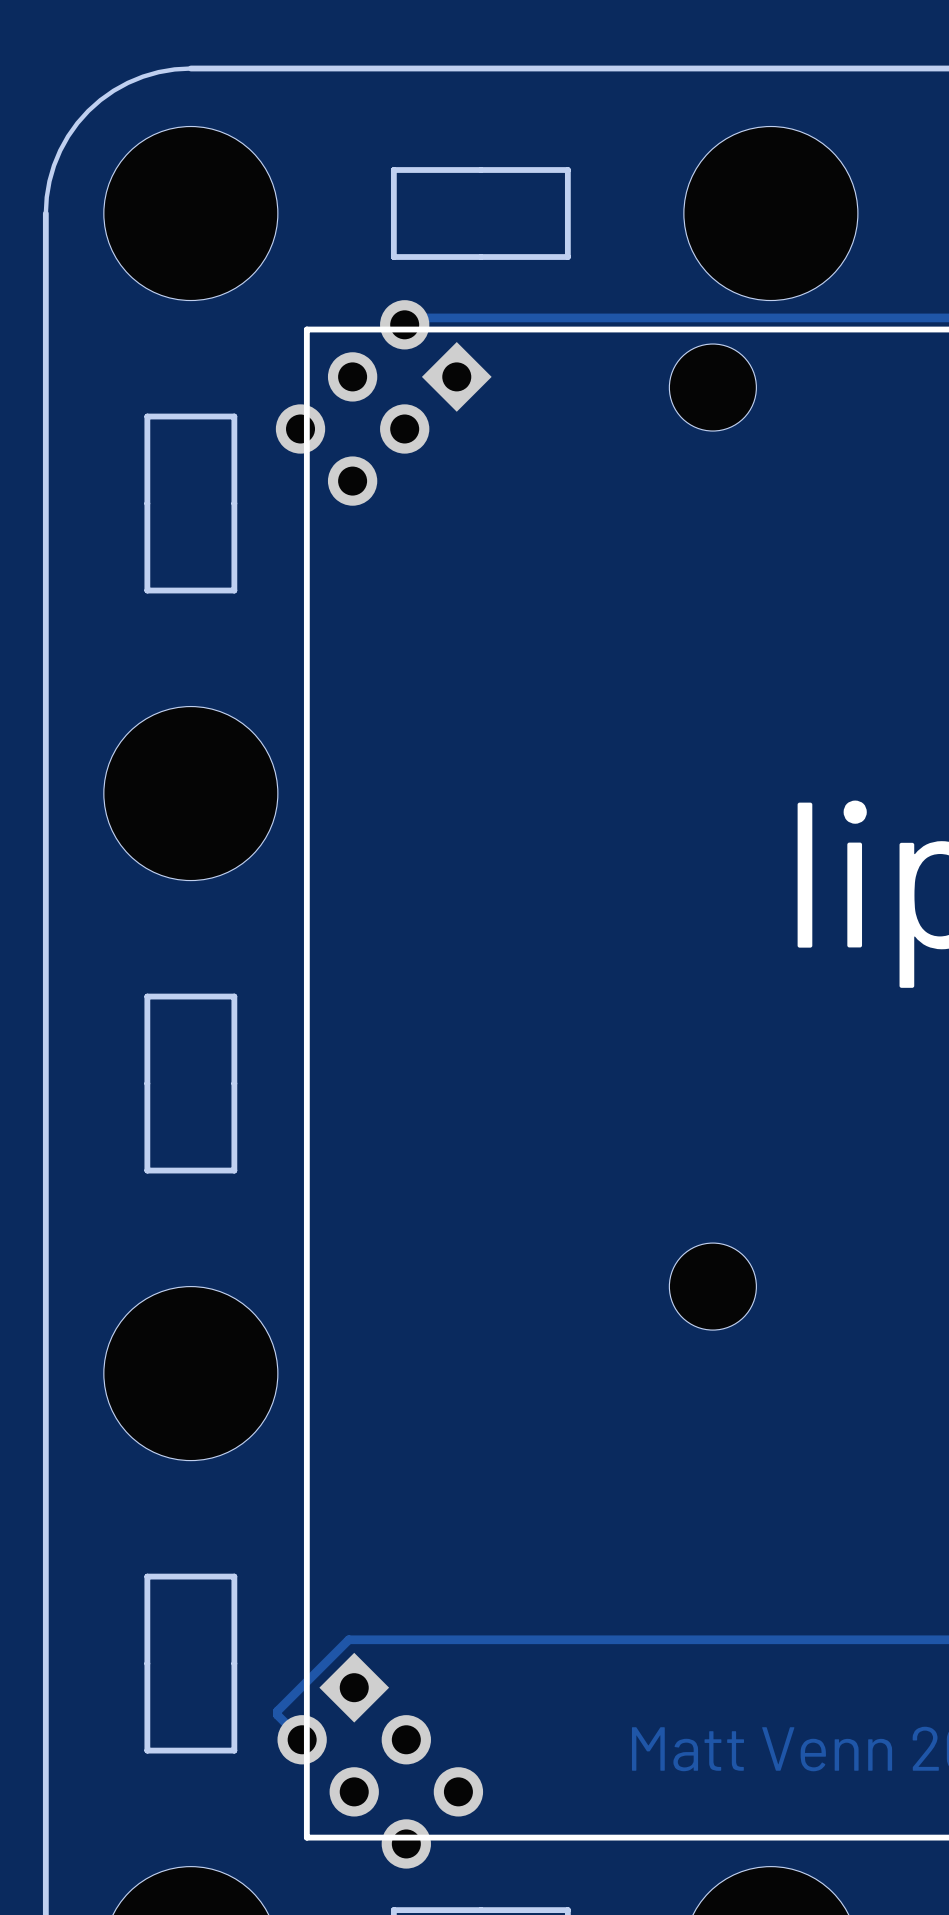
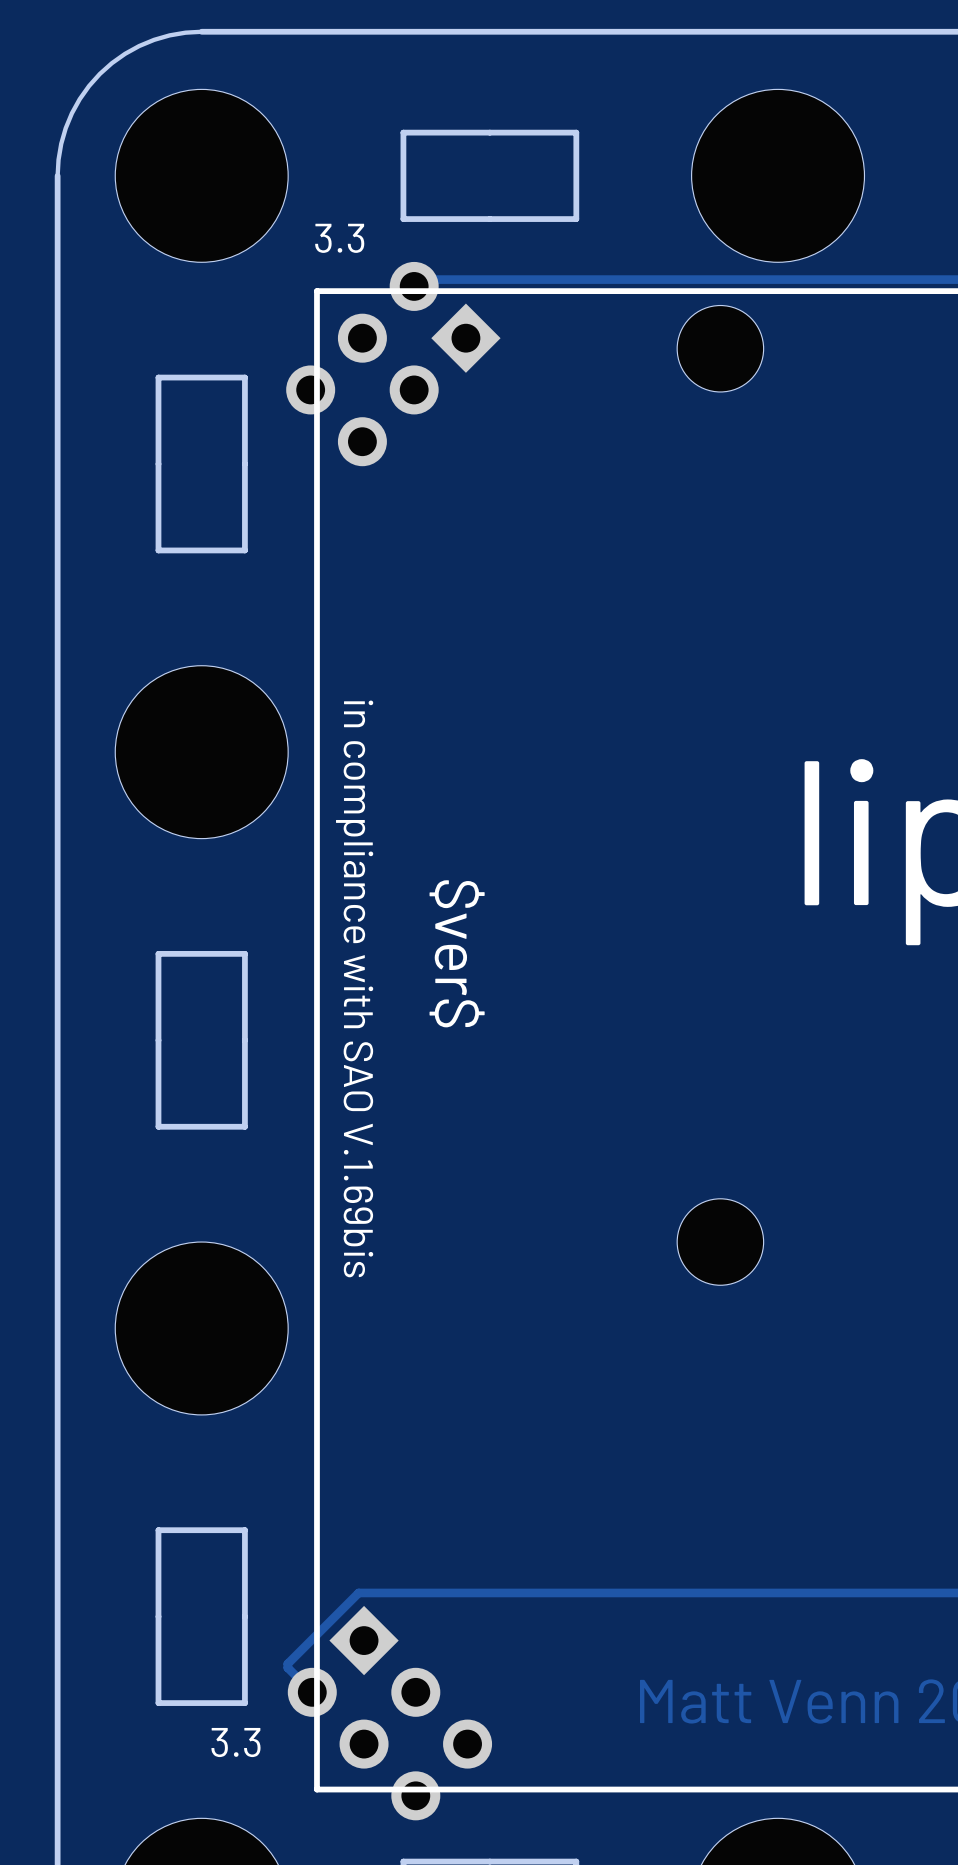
text: none -> 3.3 (339, 238)
text: none -> $ver$ (457, 953)
text: none -> in compliance with SAO V.1.69bis (354, 988)
text: none -> 3.3 (235, 1742)

